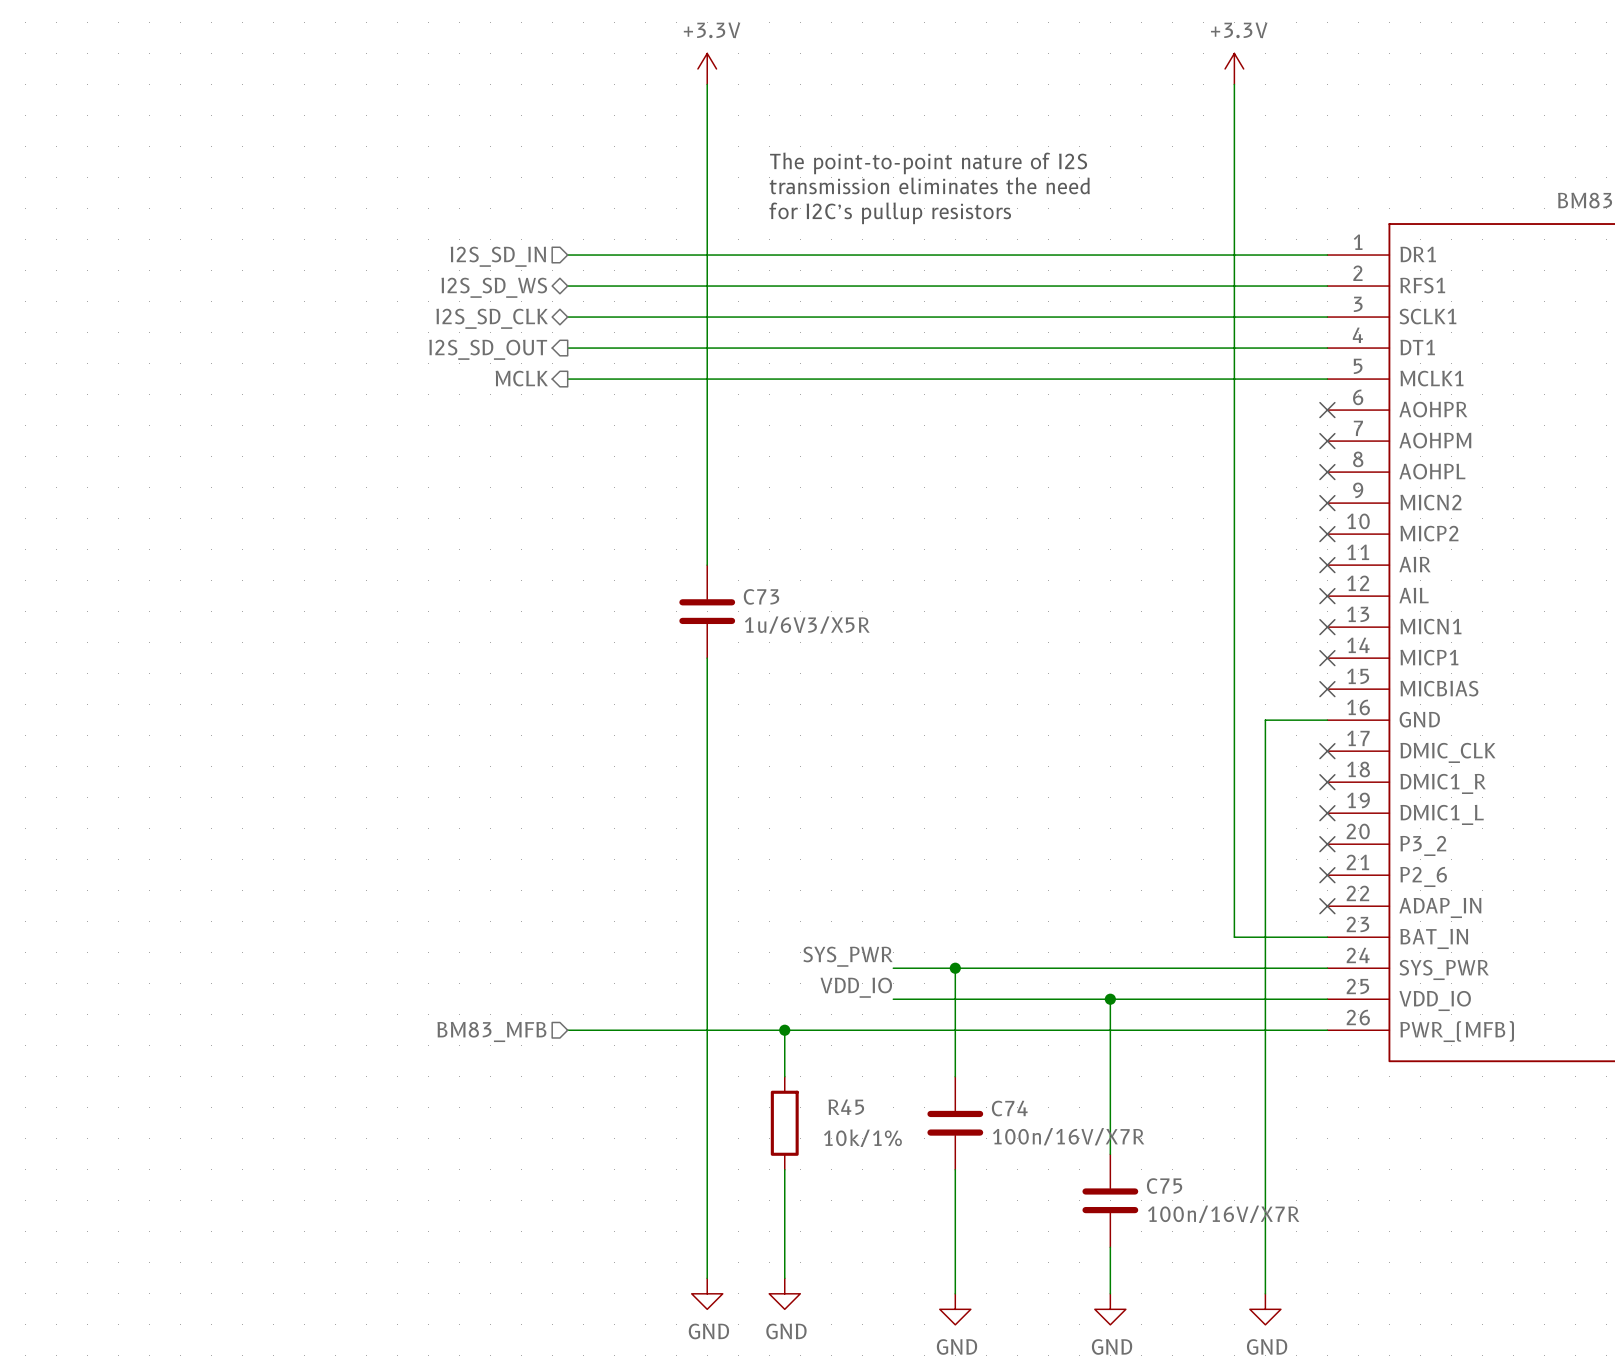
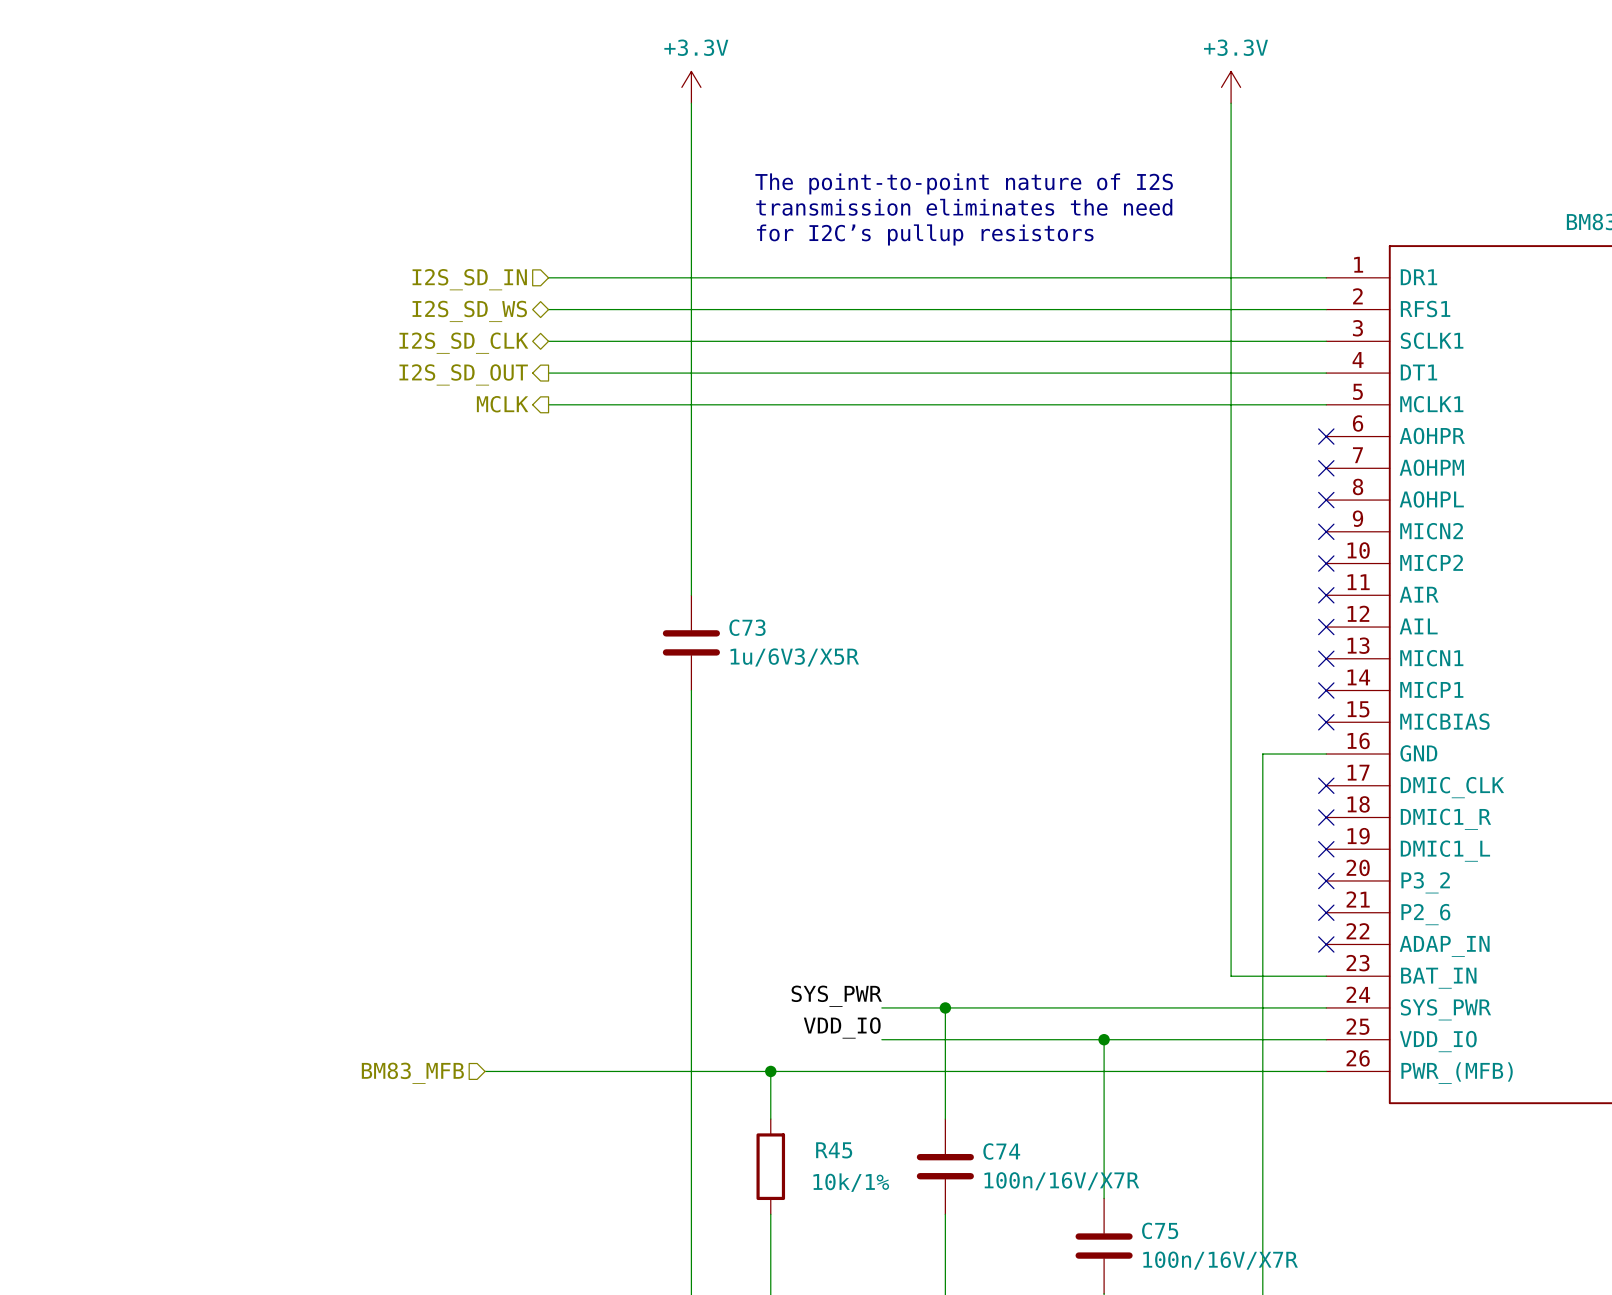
wire: none -> (485, 1071) (548, 1071)
hierarchical label position: BM83_MFB (491, 1031) -> BM83_MFB (412, 1073)

